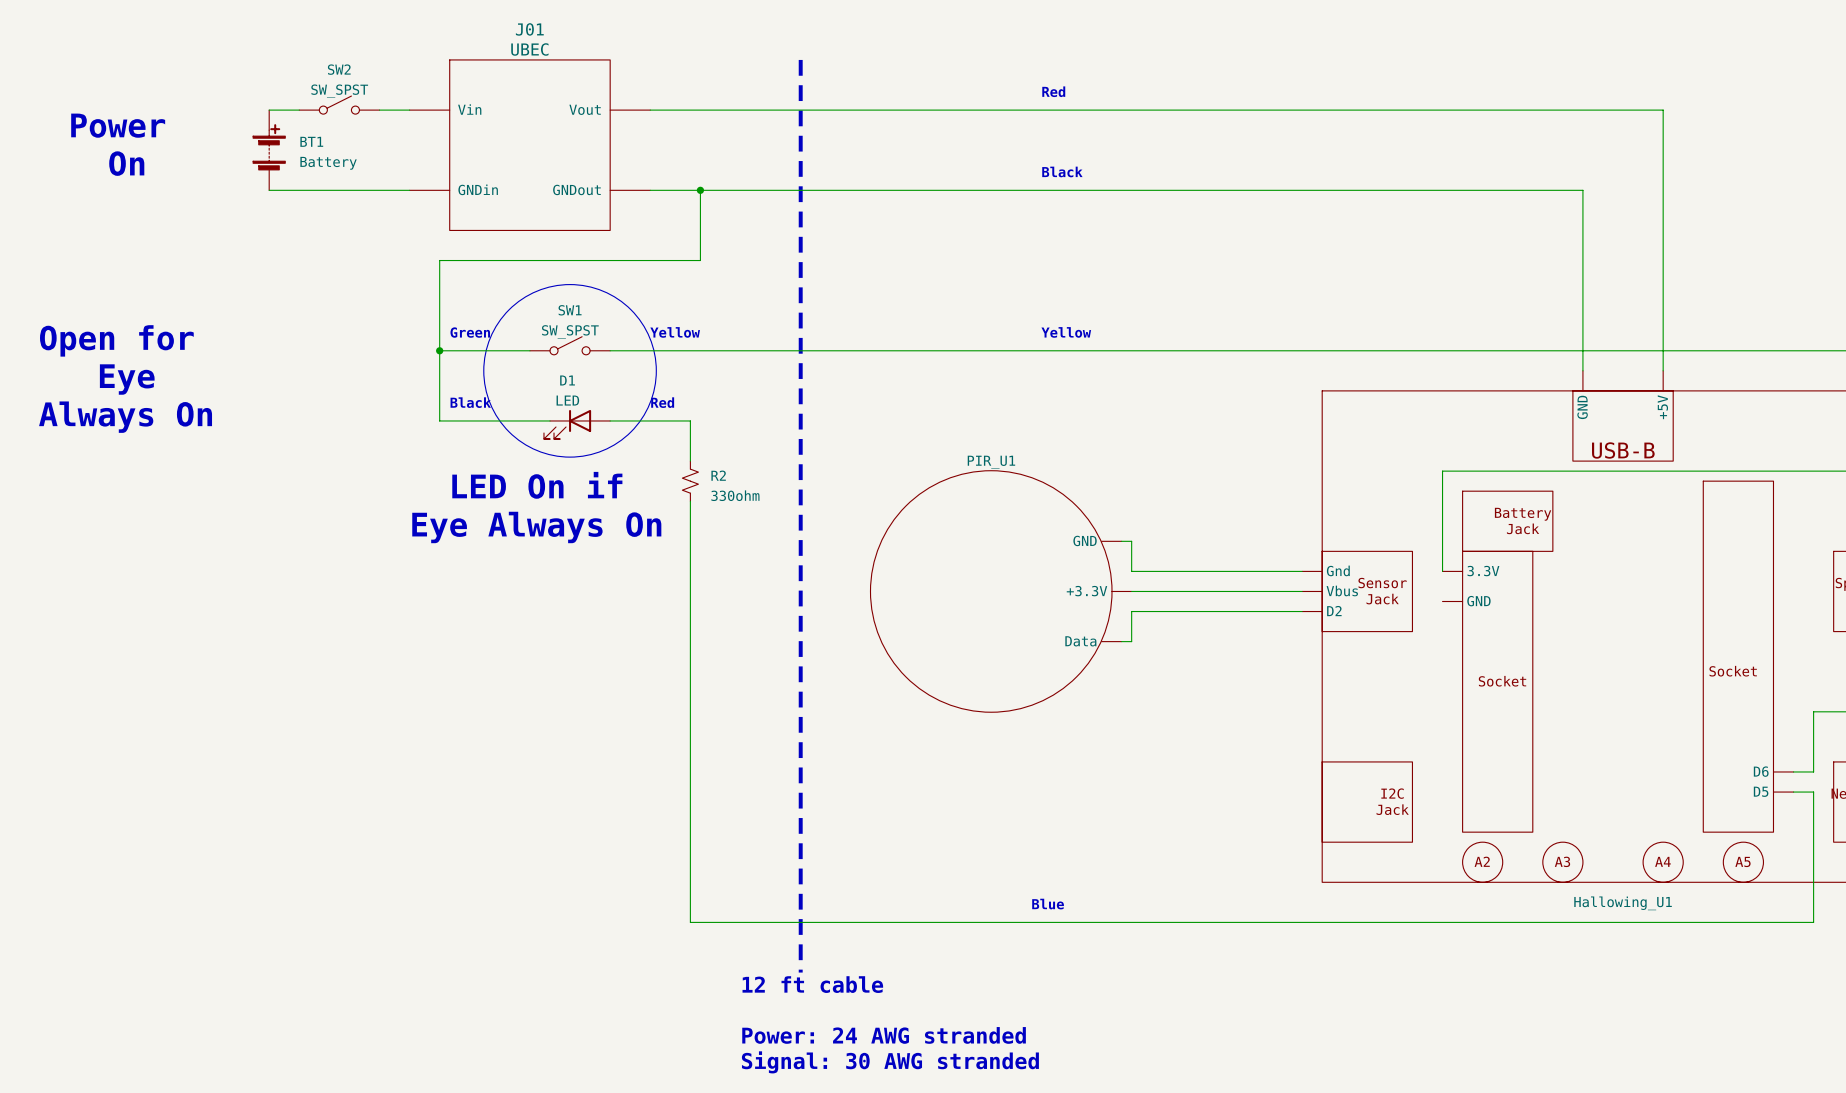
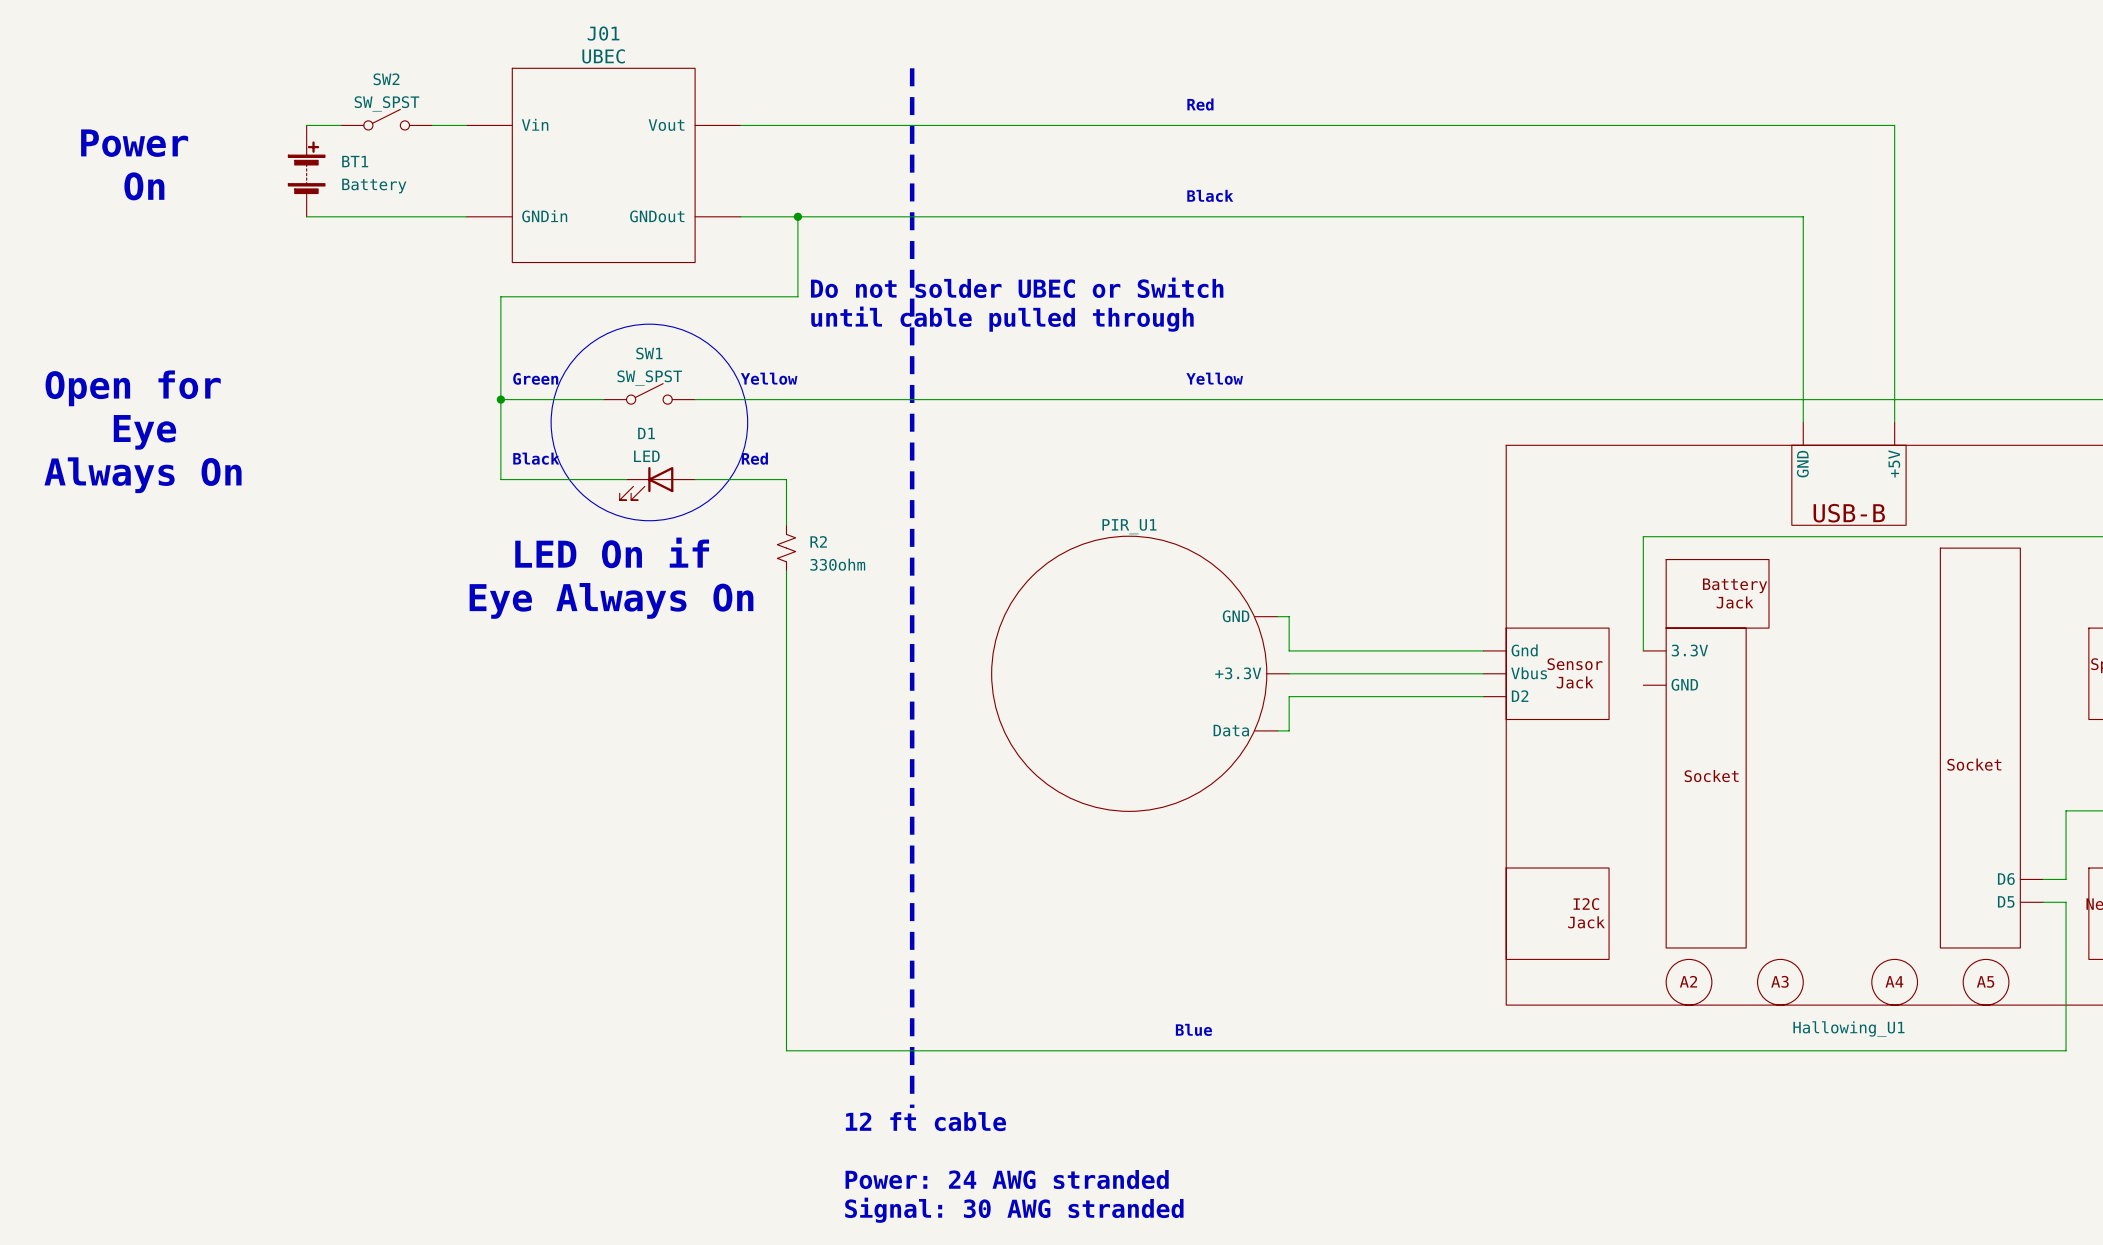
text: none -> Do not solder UBEC or Switch (1017, 287)
text: none -> until cable pulled through (1002, 319)

